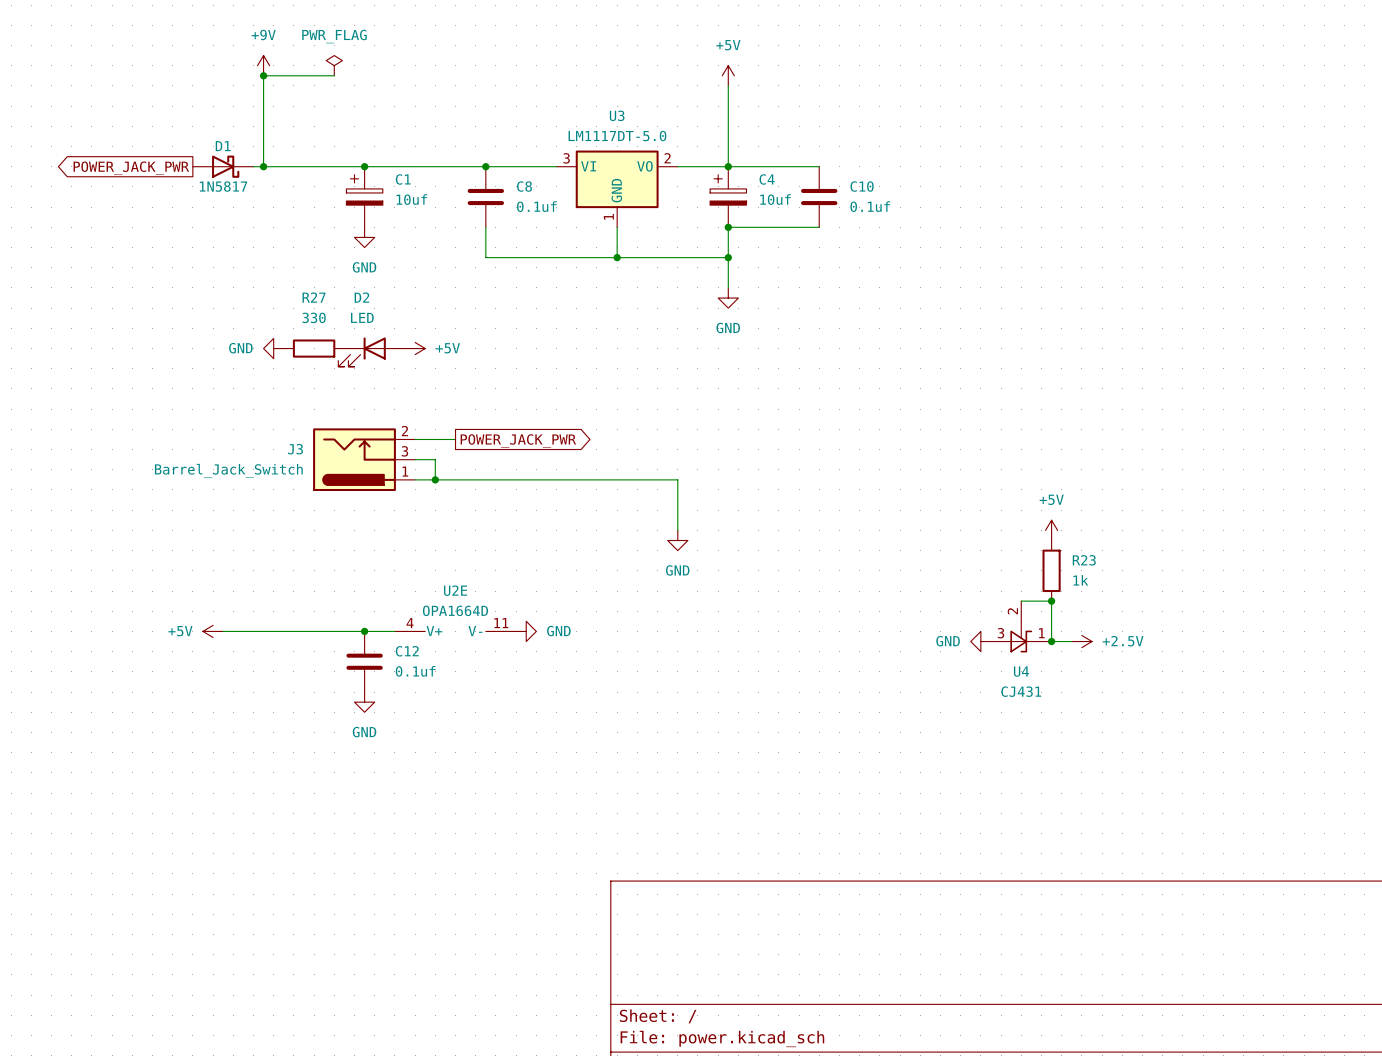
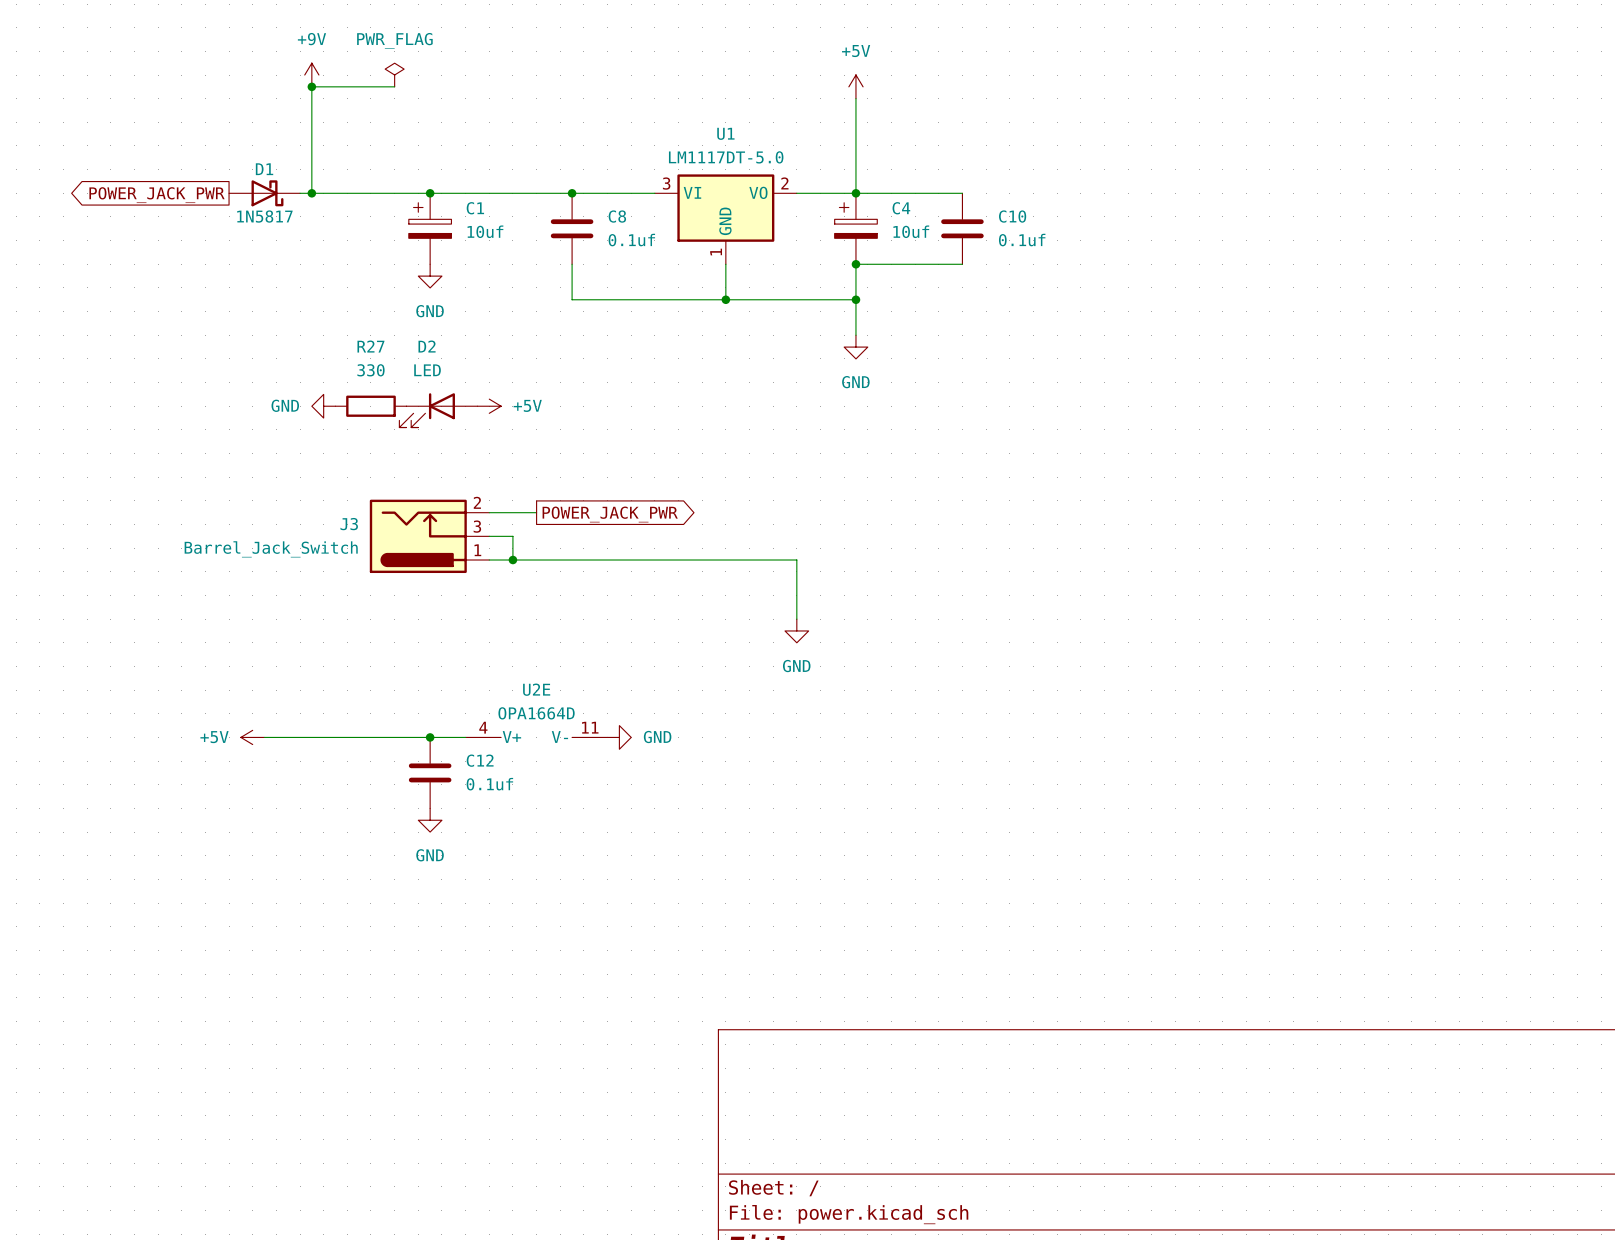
U3 name: U3 (617, 115) -> U1 (725, 133)
power symbol: +5V (1051, 530) -> none
R23: 1k (1051, 570) -> none
wire: (1021, 601) (1051, 601) (1051, 641) (1071, 641) -> none
junction: (1051, 601) -> none
U4: CJ431 (1021, 626) -> none
power symbol: GND (980, 641) -> none
junction: (1051, 641) -> none
power symbol: +2.5V (1081, 641) -> none

